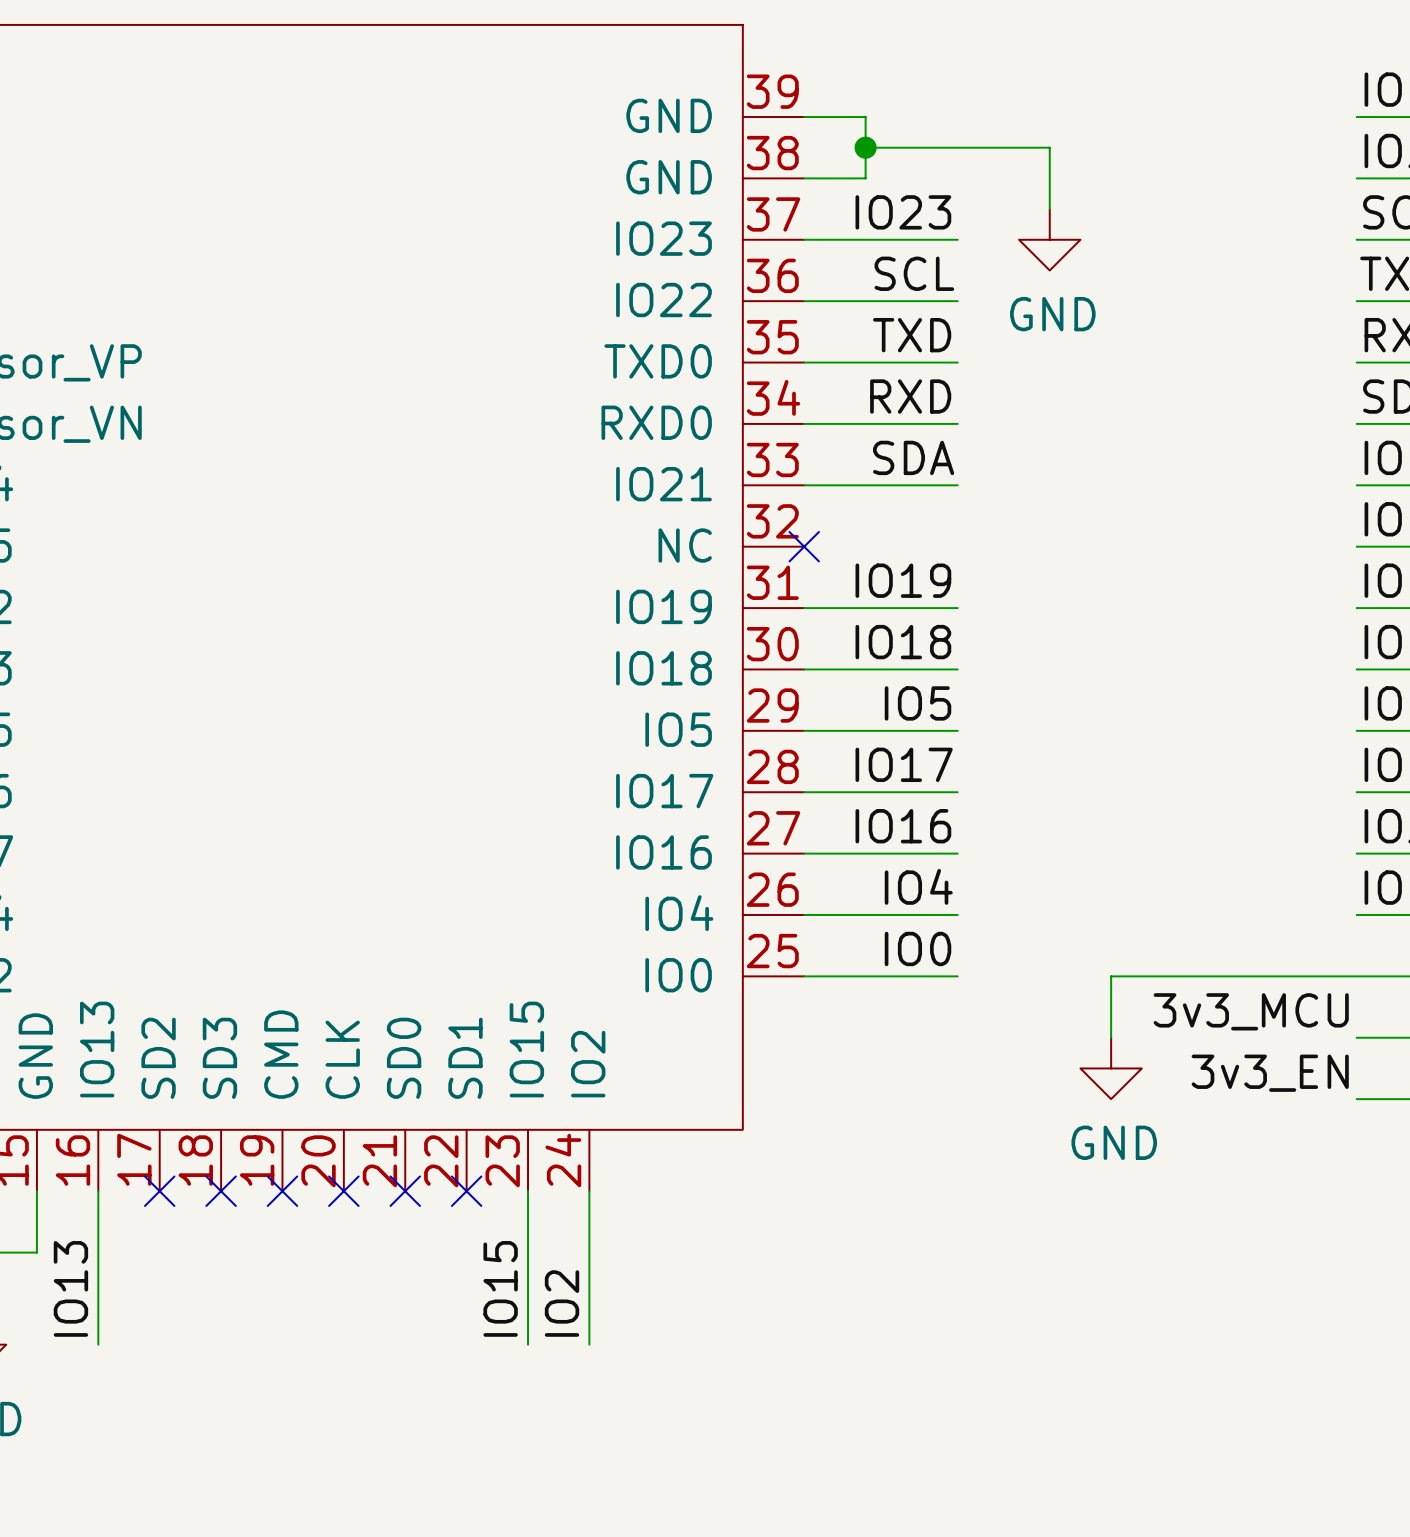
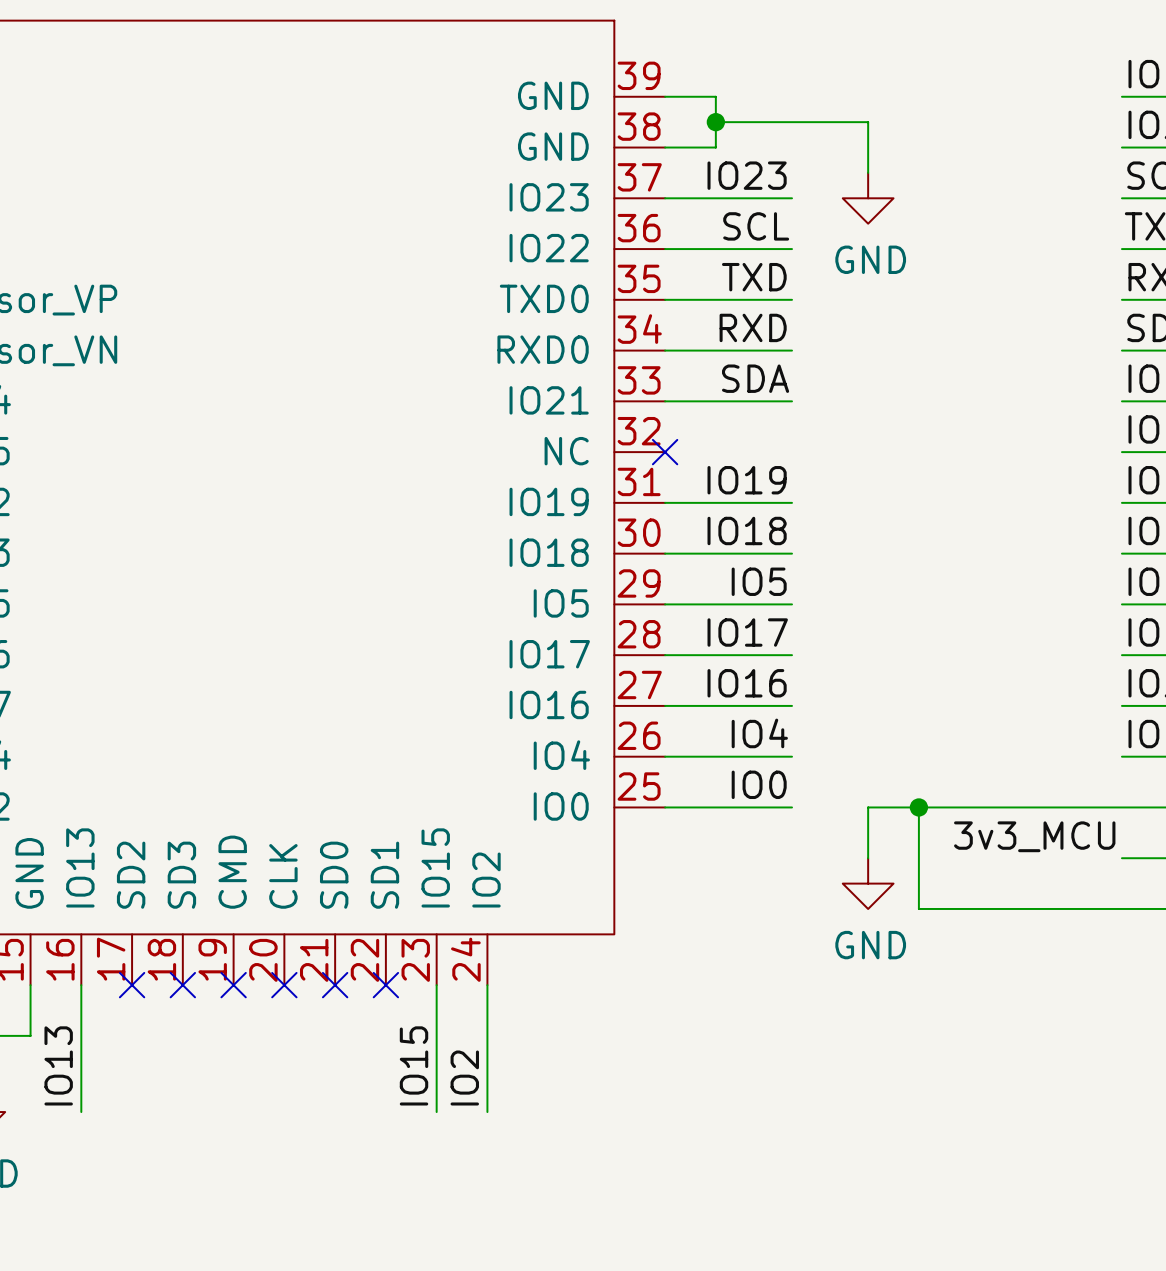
wire: none -> (918, 807) (868, 807) (868, 858)
junction: none -> (918, 807)
wire: none -> (918, 858) (918, 908) (1121, 908)
power symbol position: GND (1111, 1068) -> GND (868, 883)
label: 3v3_EN (1270, 1073) -> none

